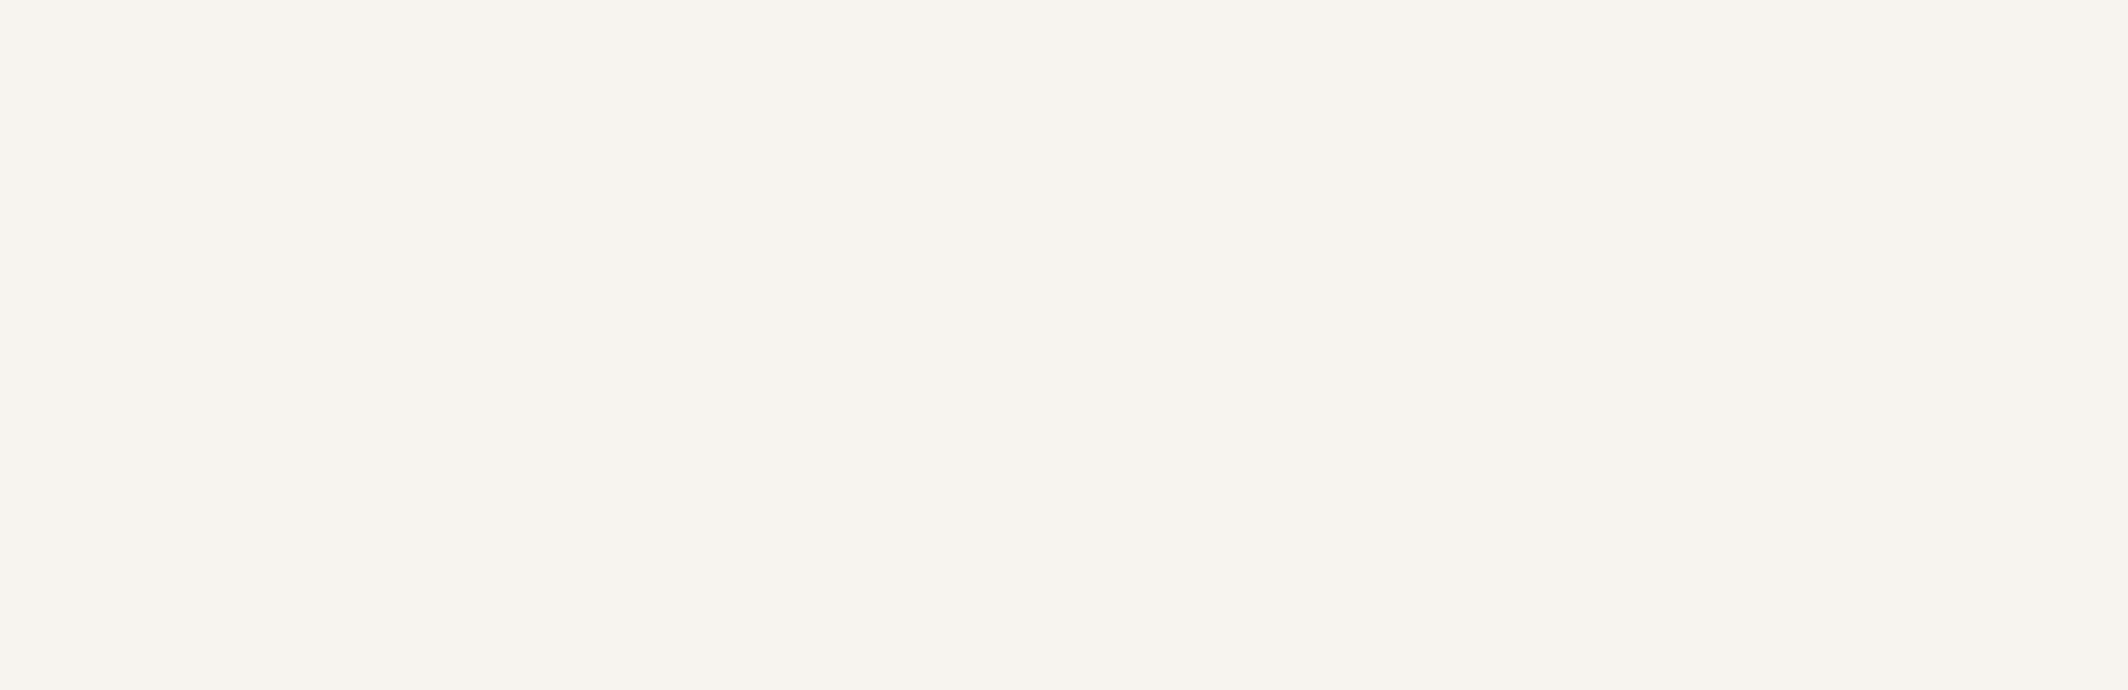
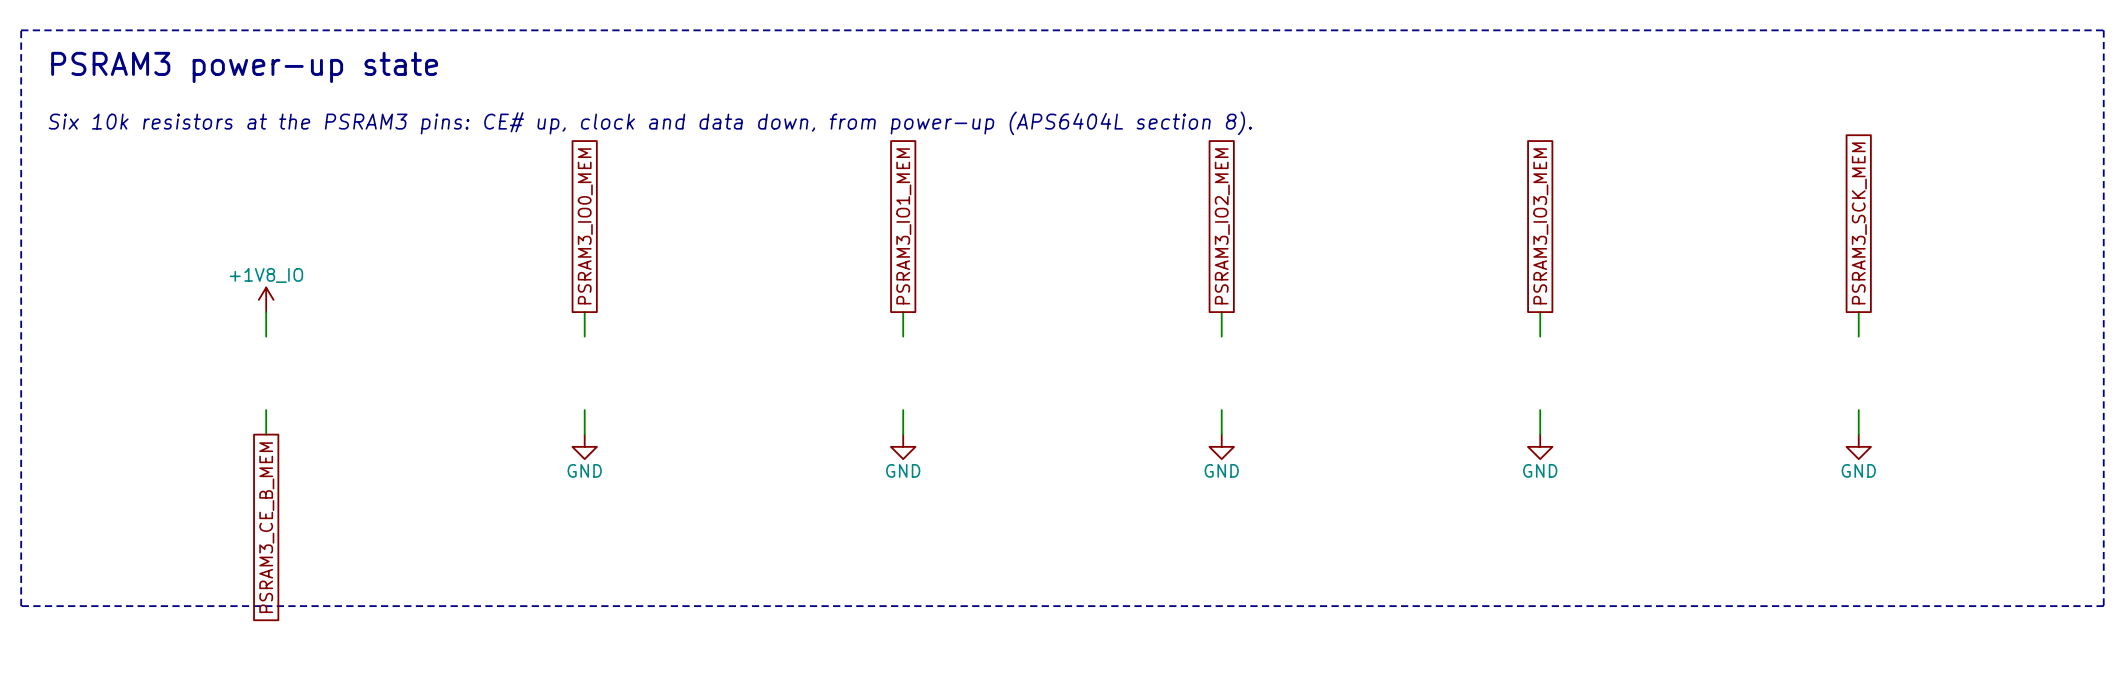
line: none -> (21, 30) (2103, 30) (2103, 606) (21, 606) (21, 30)
text: none -> PSRAM3 power-up state (244, 67)
text: none -> Six 10k resistors at the PSRAM3 pins: CE# up, clock and data down, from power-up (APS6404L section 8). (650, 123)
global label: none -> PSRAM3_SCK_MEM (1859, 223)
global label: none -> PSRAM3_IO0_MEM (585, 226)
global label: none -> PSRAM3_IO1_MEM (903, 226)
global label: none -> PSRAM3_IO2_MEM (1222, 226)
global label: none -> PSRAM3_IO3_MEM (1540, 226)
power symbol: none -> +1V8_IO (266, 299)
wire: none -> (266, 312) (266, 336)
wire: none -> (584, 312) (584, 336)
wire: none -> (903, 312) (903, 336)
wire: none -> (1221, 312) (1221, 336)
wire: none -> (1540, 312) (1540, 336)
wire: none -> (1858, 312) (1858, 336)
wire: none -> (266, 410) (266, 434)
wire: none -> (584, 410) (584, 434)
wire: none -> (903, 410) (903, 434)
wire: none -> (1221, 410) (1221, 434)
wire: none -> (1540, 410) (1540, 434)
wire: none -> (1858, 410) (1858, 434)
power symbol: none -> GND (584, 446)
power symbol: none -> GND (903, 446)
power symbol: none -> GND (1221, 446)
power symbol: none -> GND (1540, 446)
power symbol: none -> GND (1858, 446)
global label: none -> PSRAM3_CE_B_MEM (266, 527)

